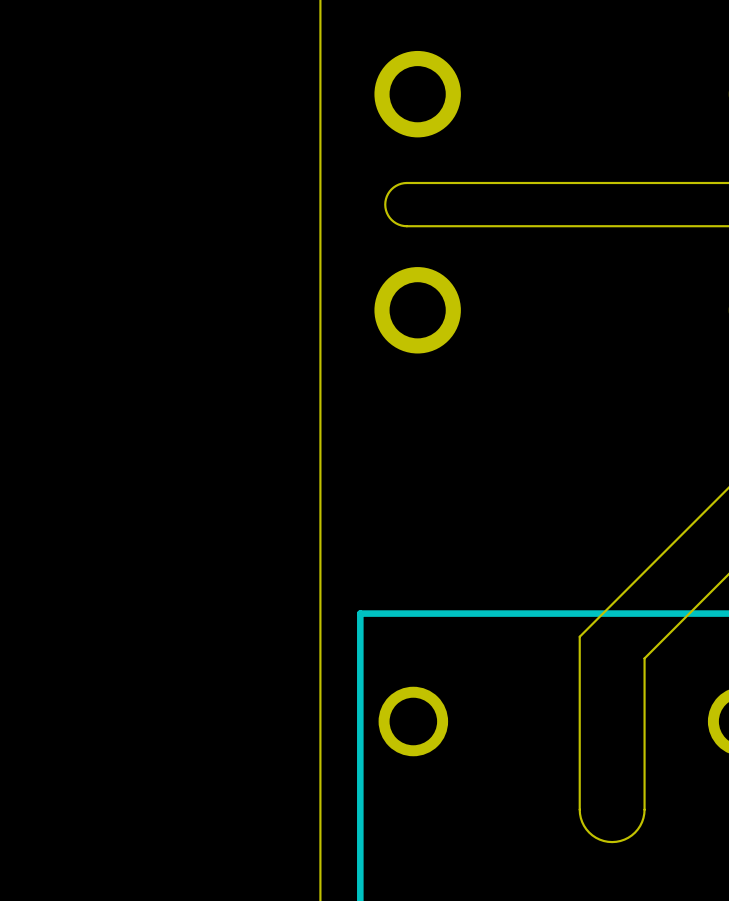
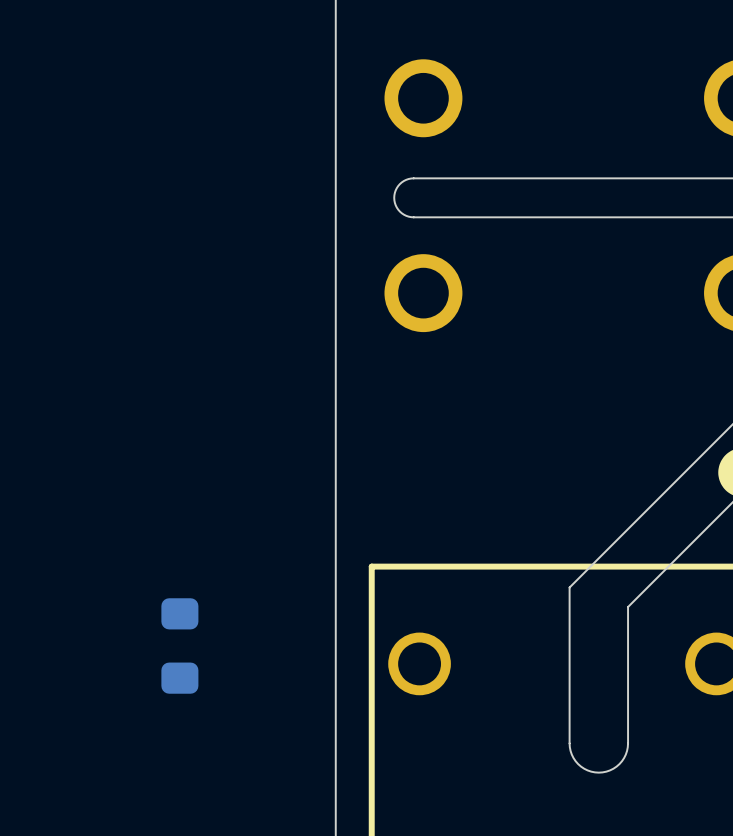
part: none -> (179, 645)

